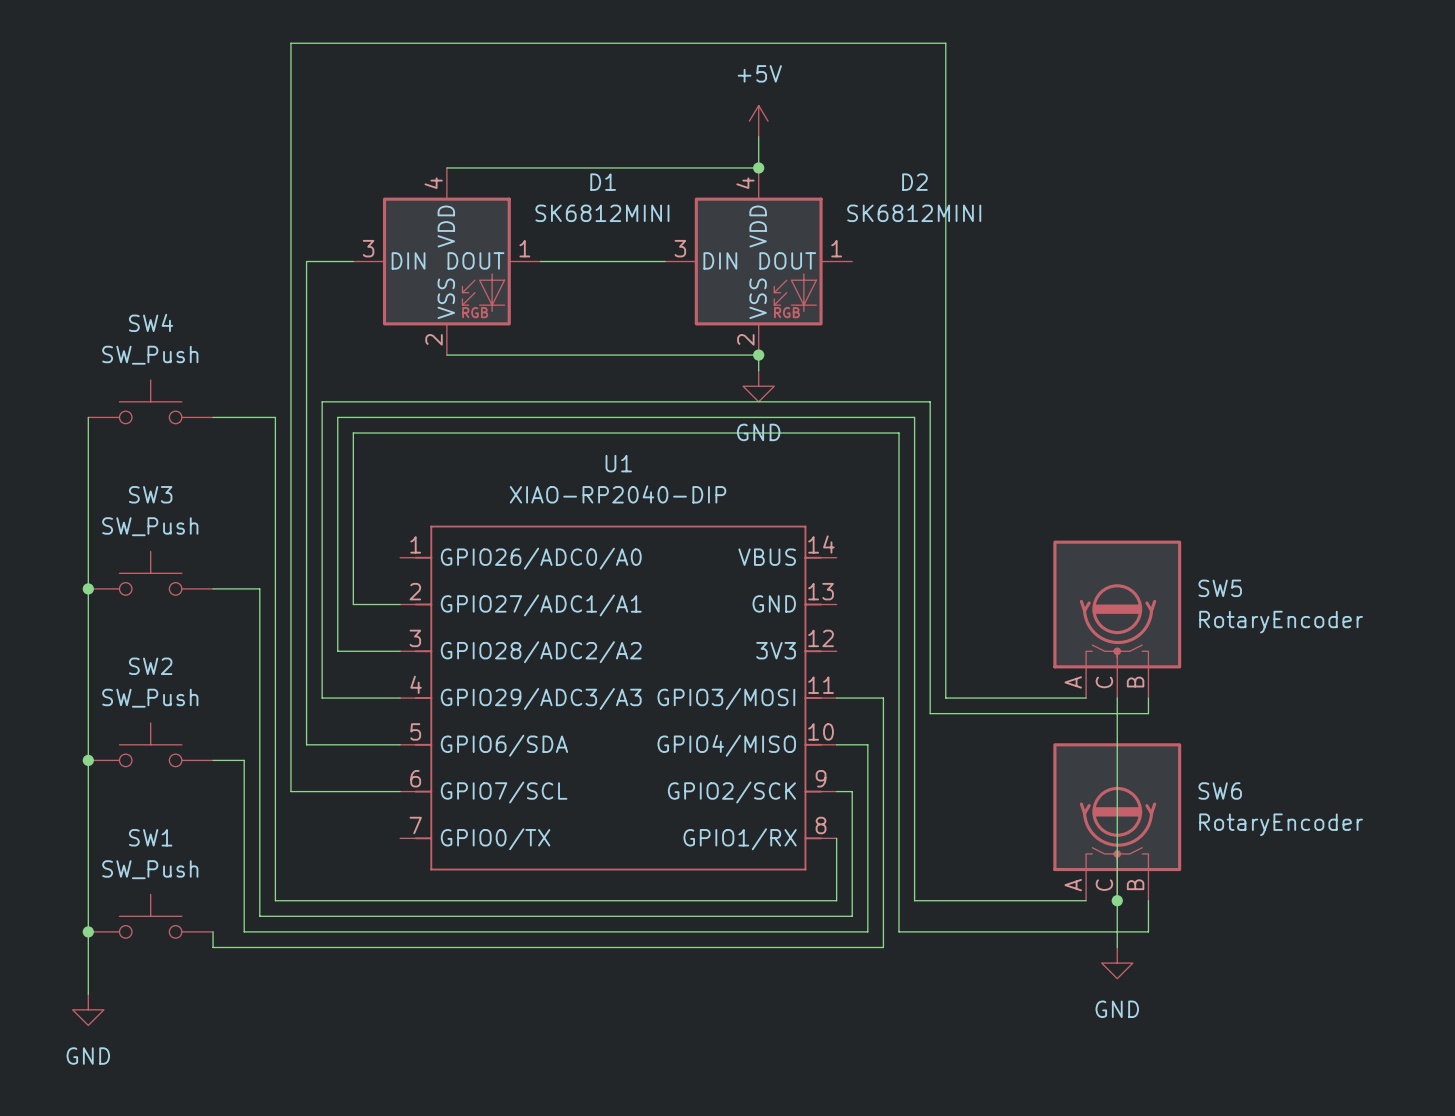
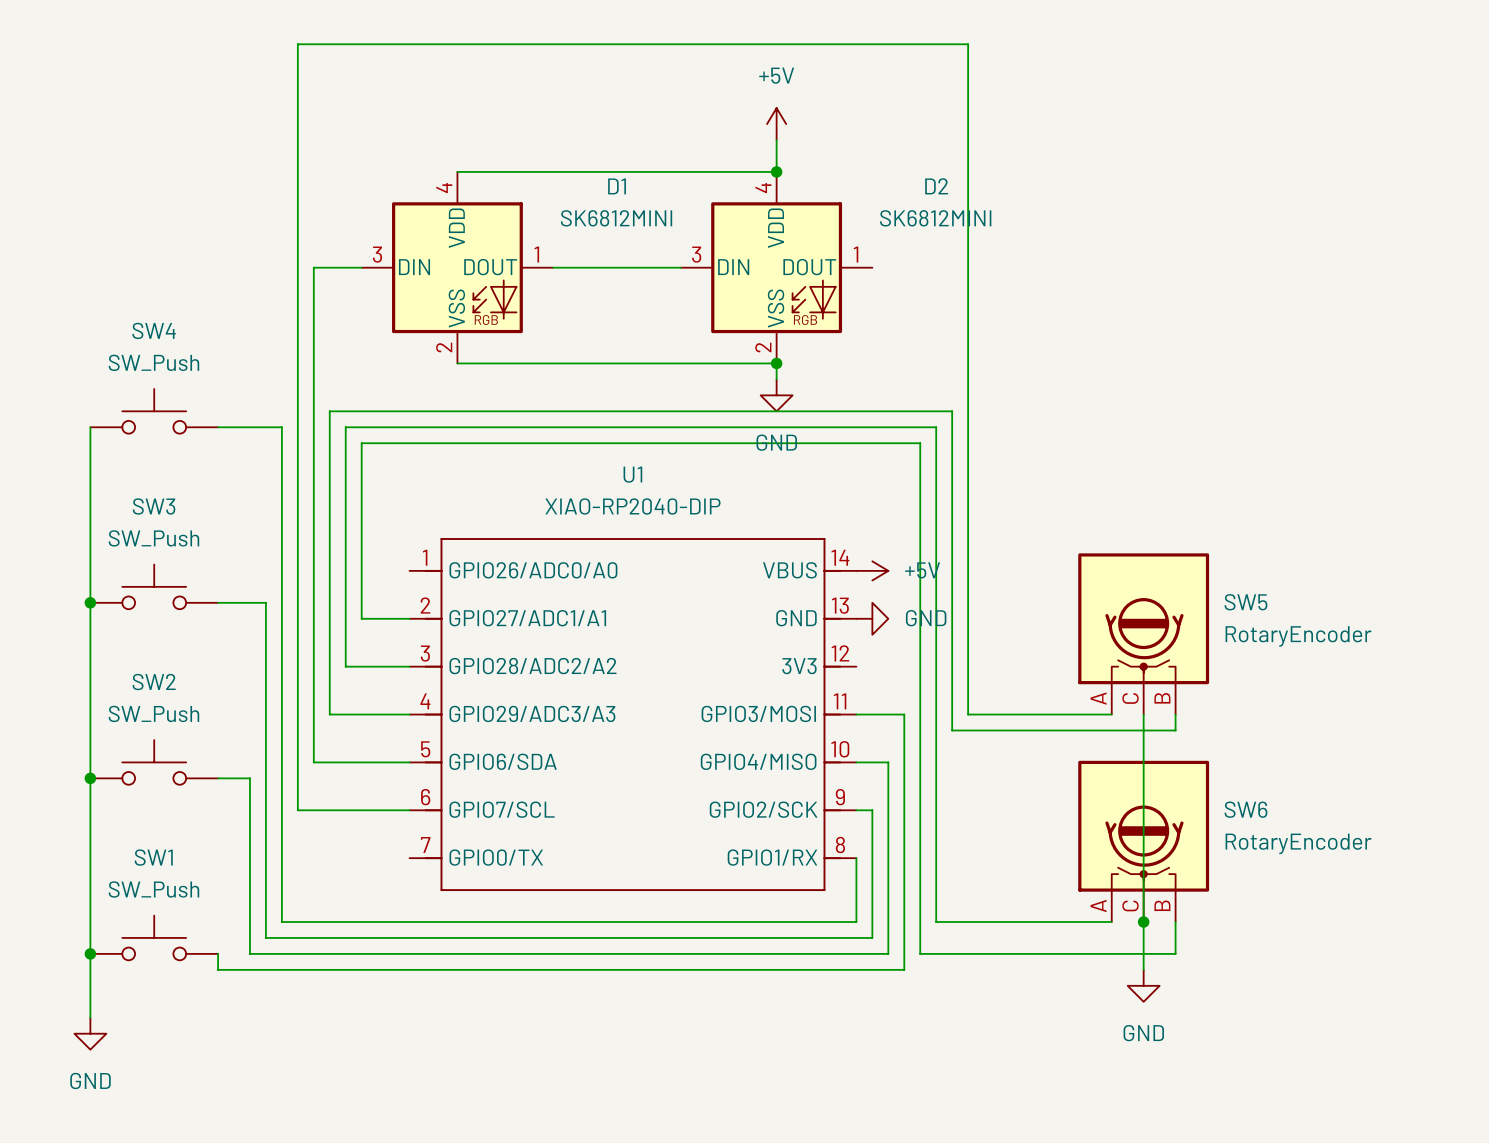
power symbol: none -> +5V (872, 570)
power symbol: none -> GND (872, 618)

